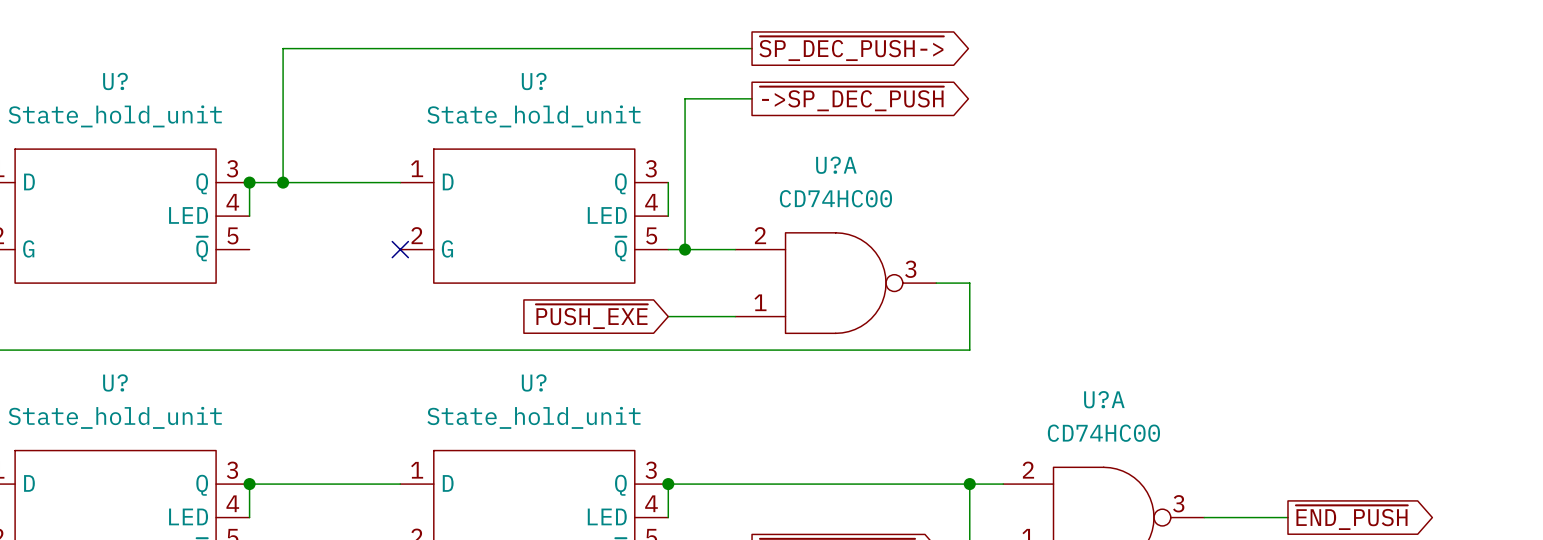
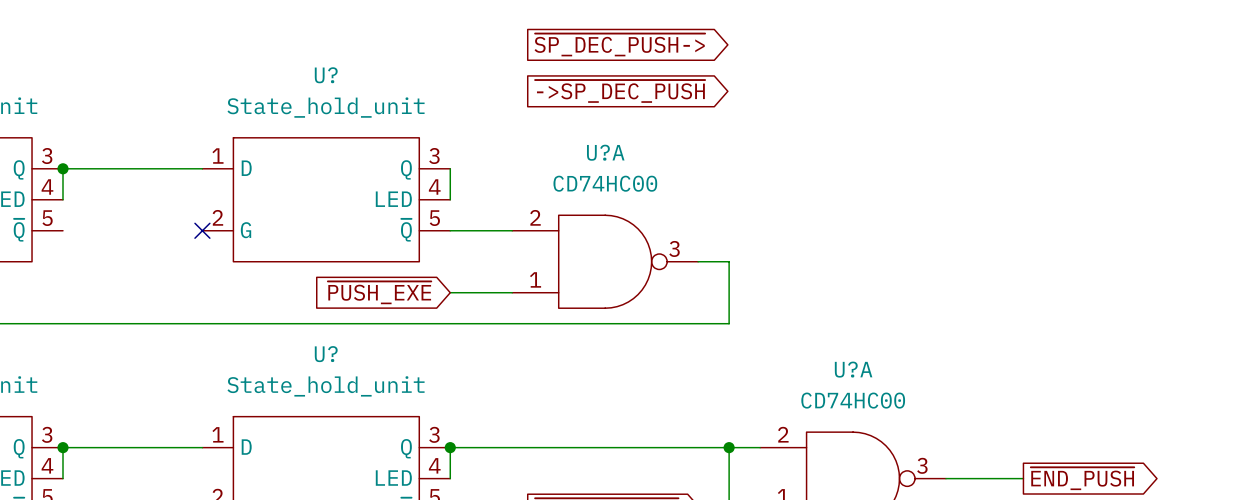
wire: (752, 48) (283, 48) (283, 182) -> none
wire: (752, 98) (685, 98) (685, 249) -> none
junction: (283, 182) -> none
junction: (685, 249) -> none

